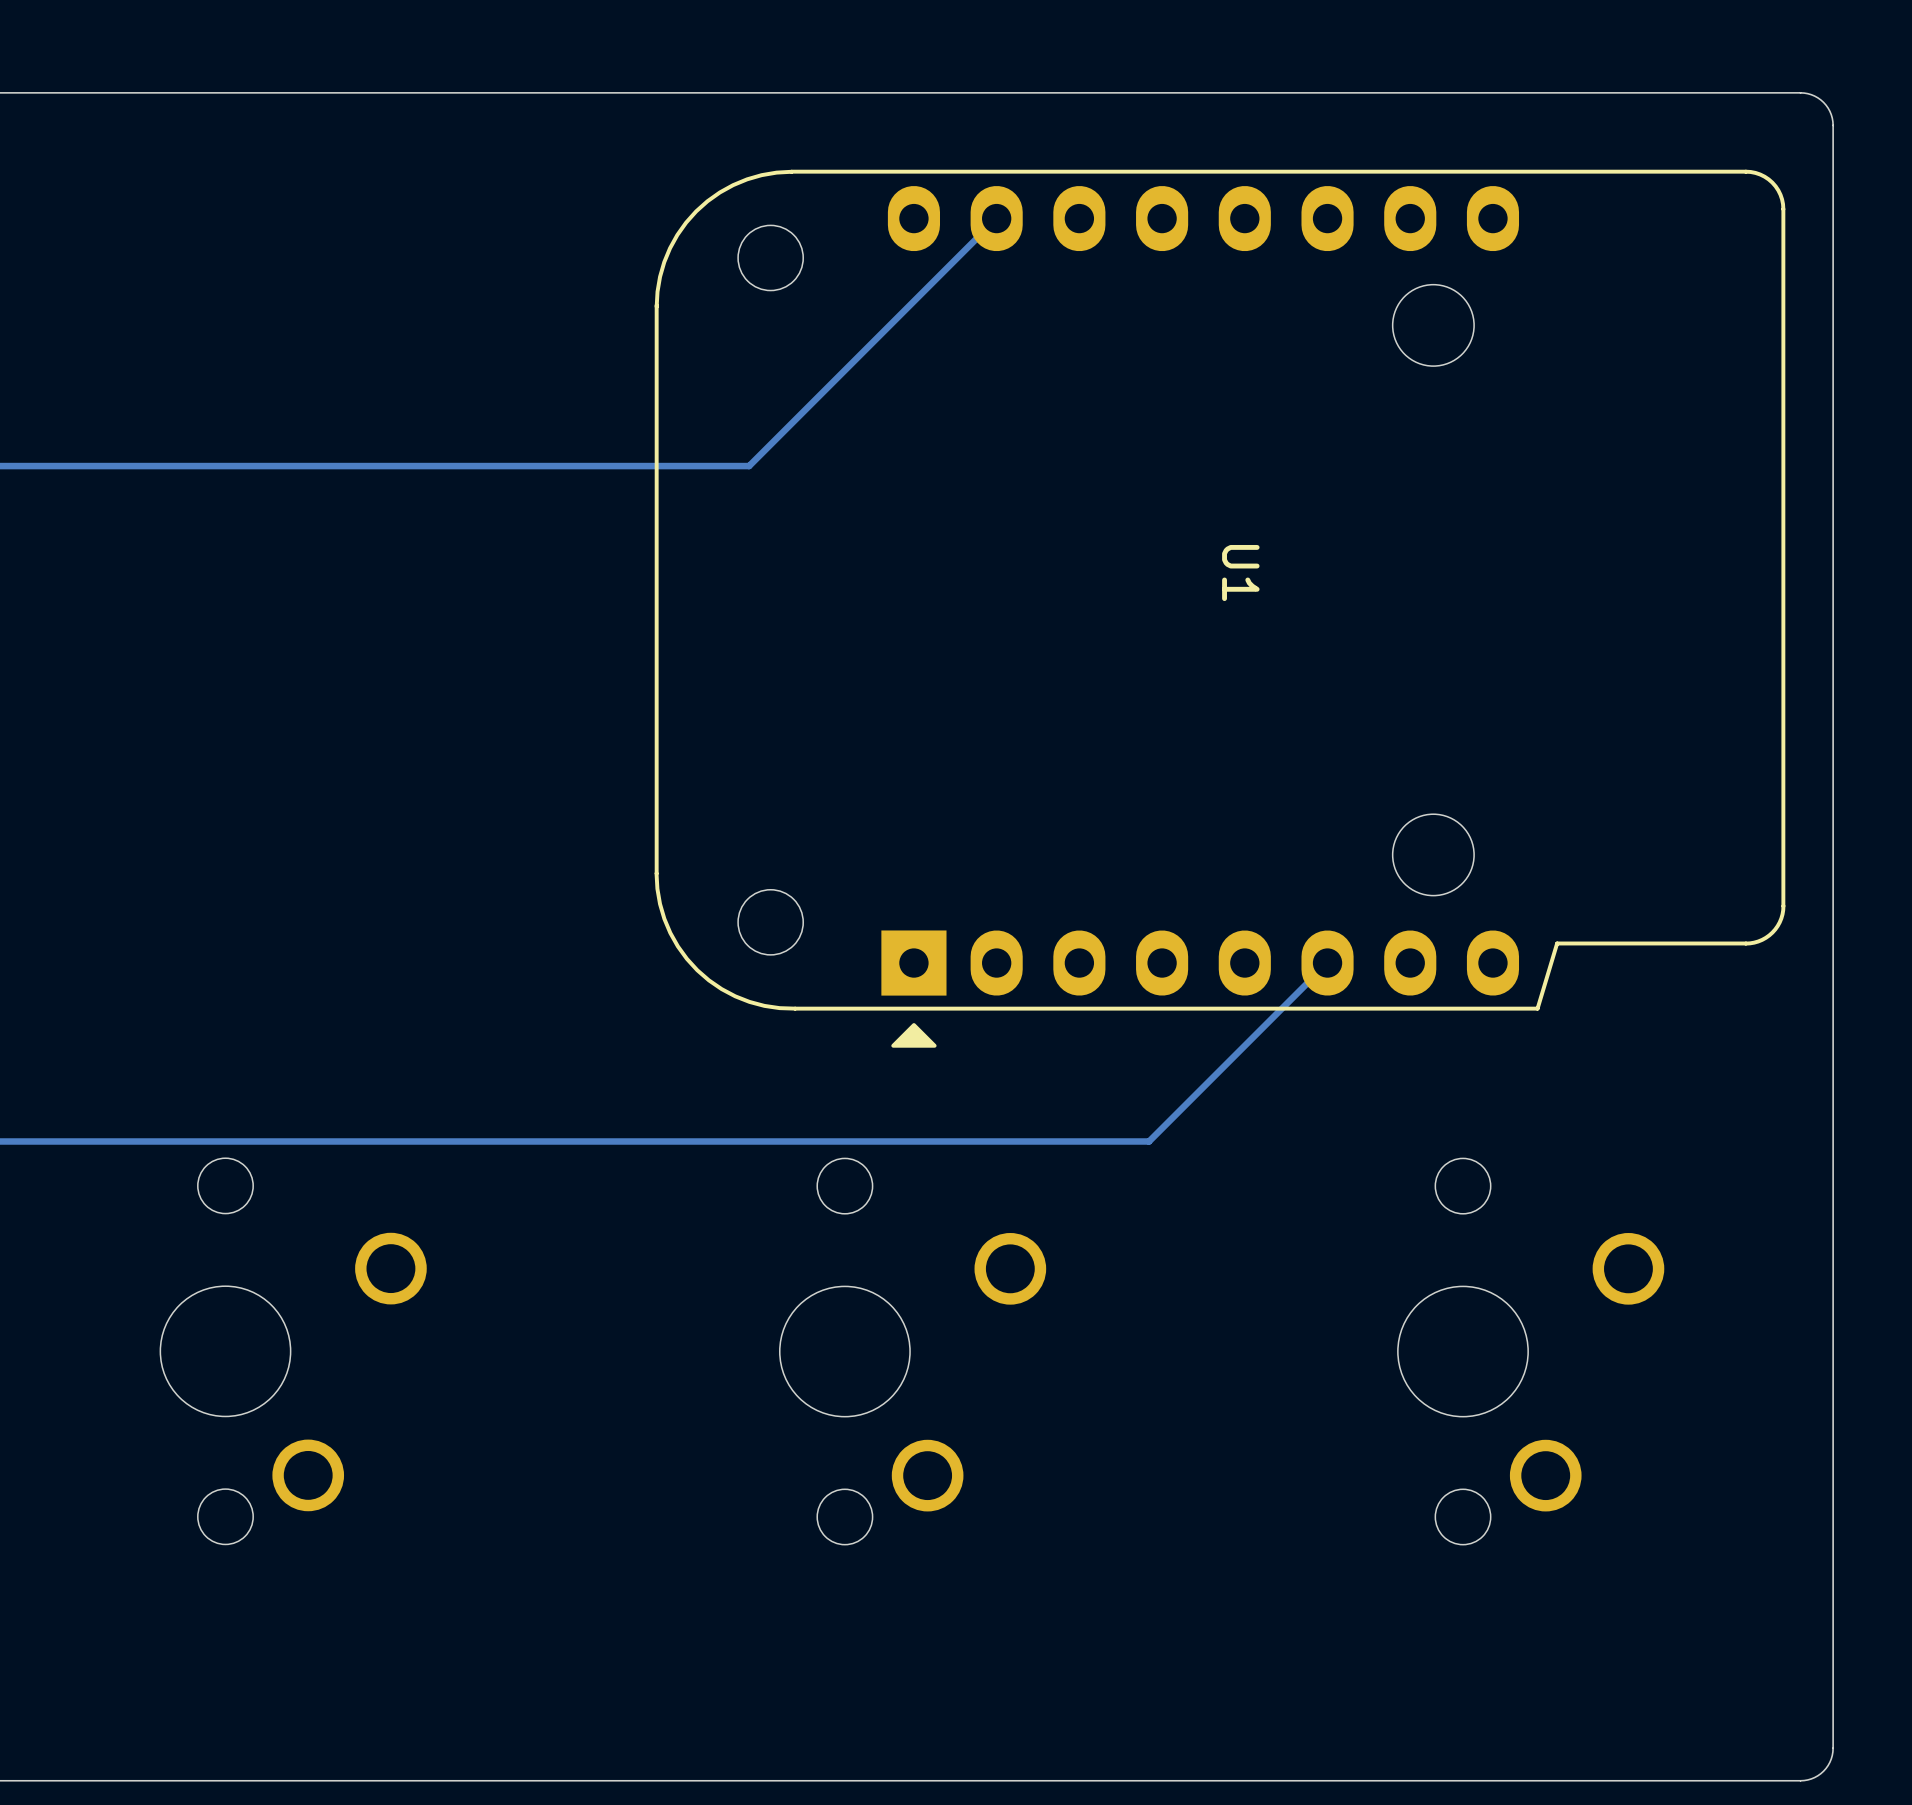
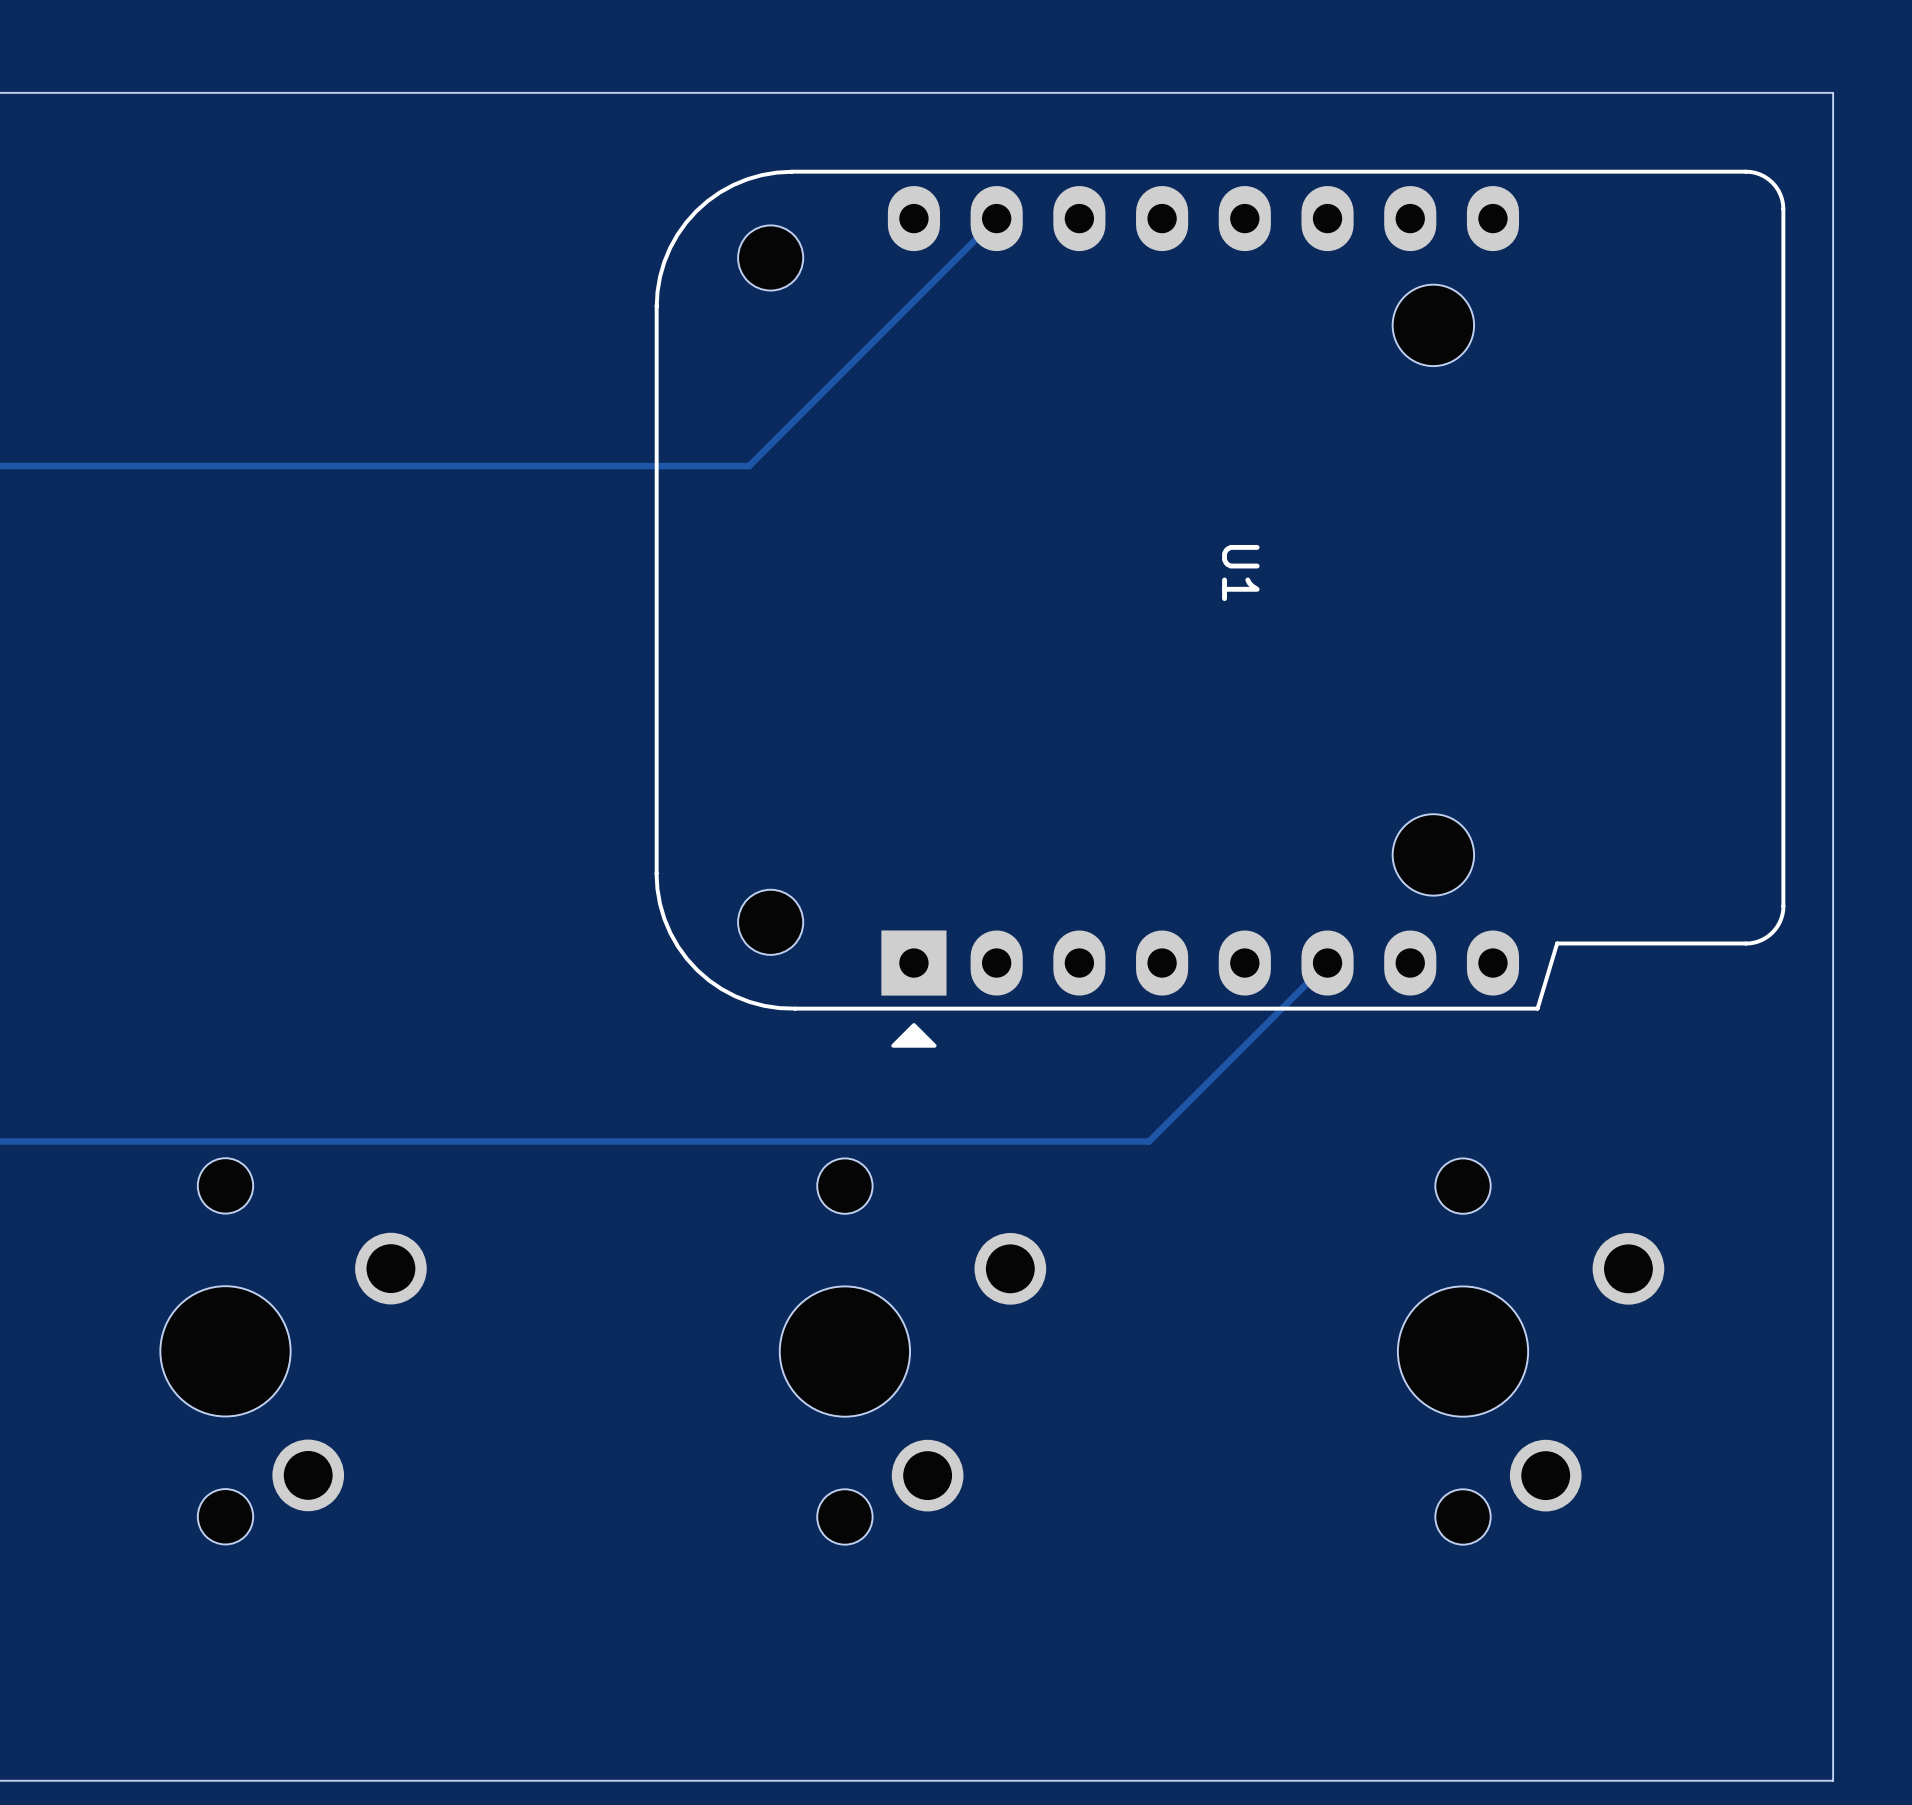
board edge: (1800, 92) (1814, 96) (1823, 102) (1831, 114) (1833, 125) -> (1800, 92) (1833, 92) (1833, 125)
board edge: (1833, 1748) (1831, 1758) (1823, 1771) (1814, 1777) (1800, 1780) -> (1833, 1748) (1833, 1780) (1800, 1780)

